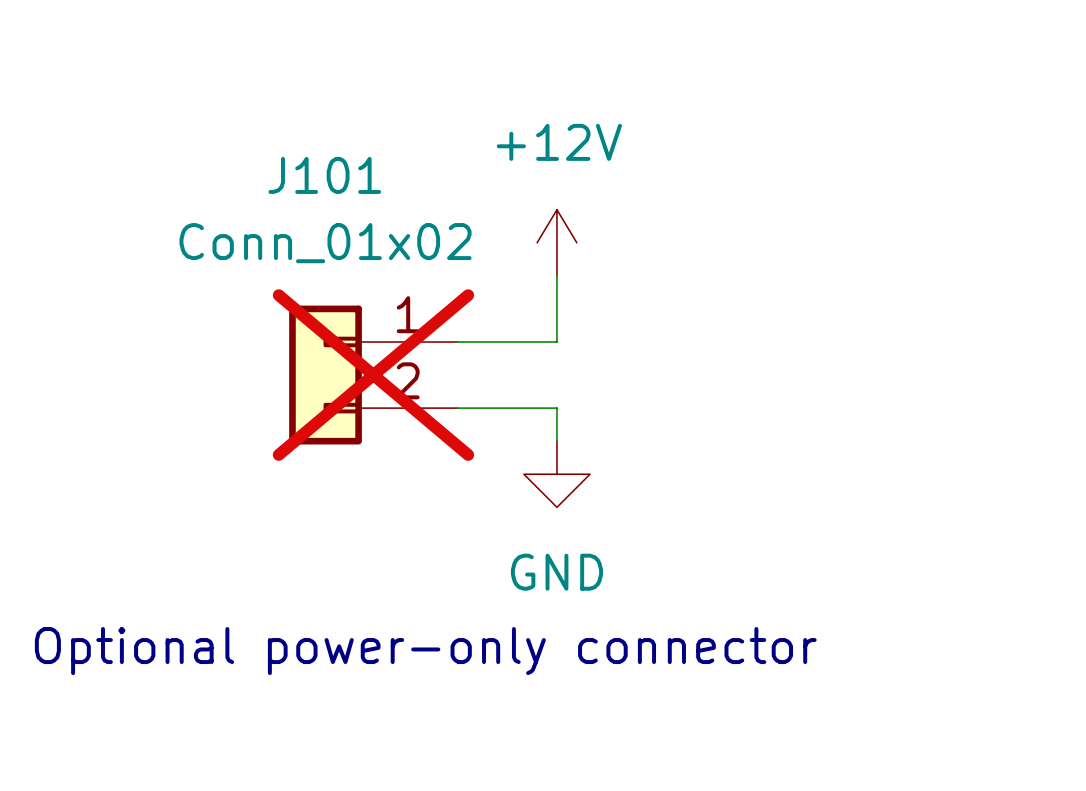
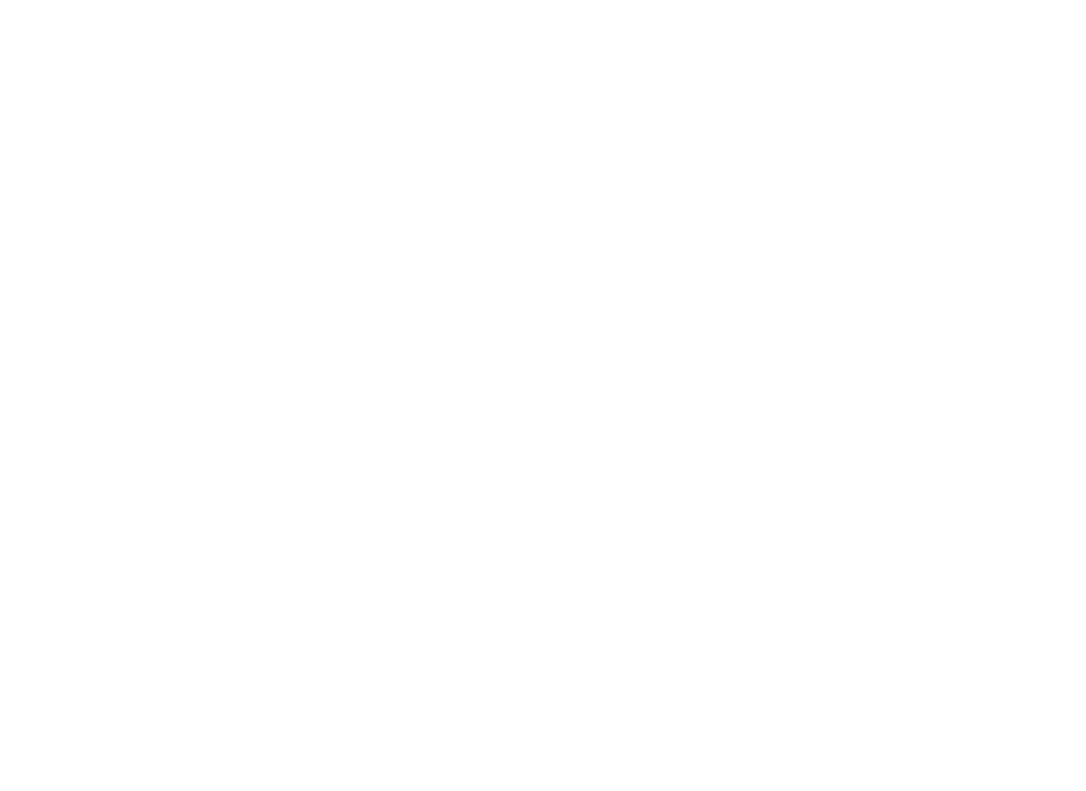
power symbol: +12V (556, 242) -> none
wire: (556, 275) (556, 341) (457, 341) -> none
J101: Conn_01x02 (373, 375) -> none
wire: (457, 408) (556, 408) (556, 441) -> none
power symbol: GND (556, 474) -> none
text: Optional power-only connector (425, 651) -> none

